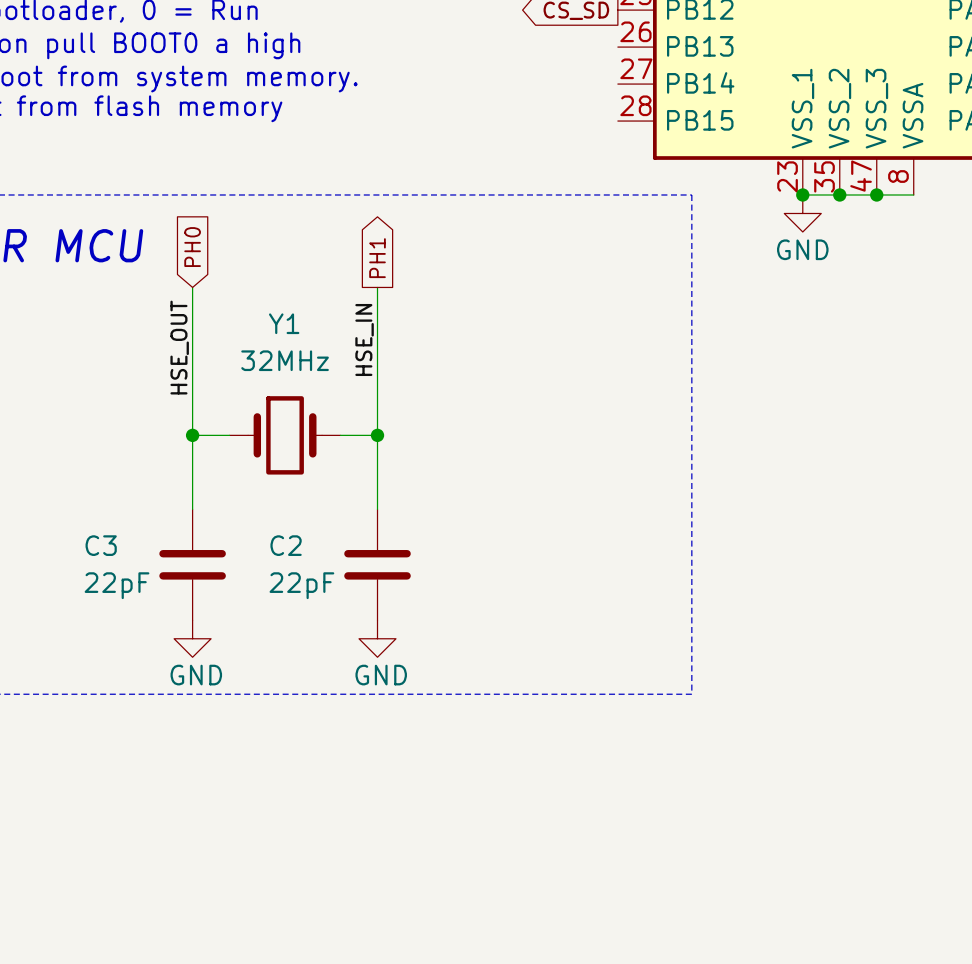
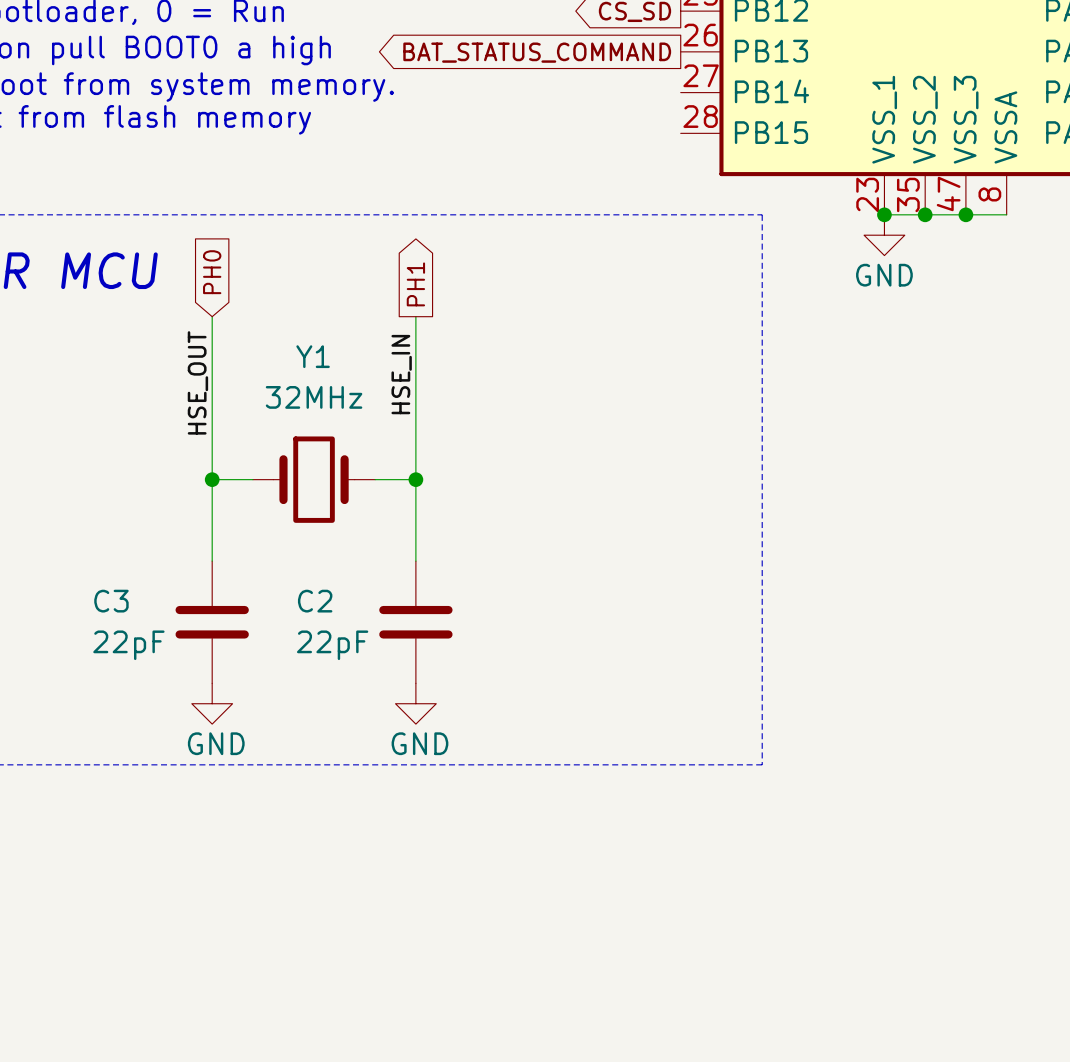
global label: none -> BAT_STATUS_COMMAND (537, 52)

